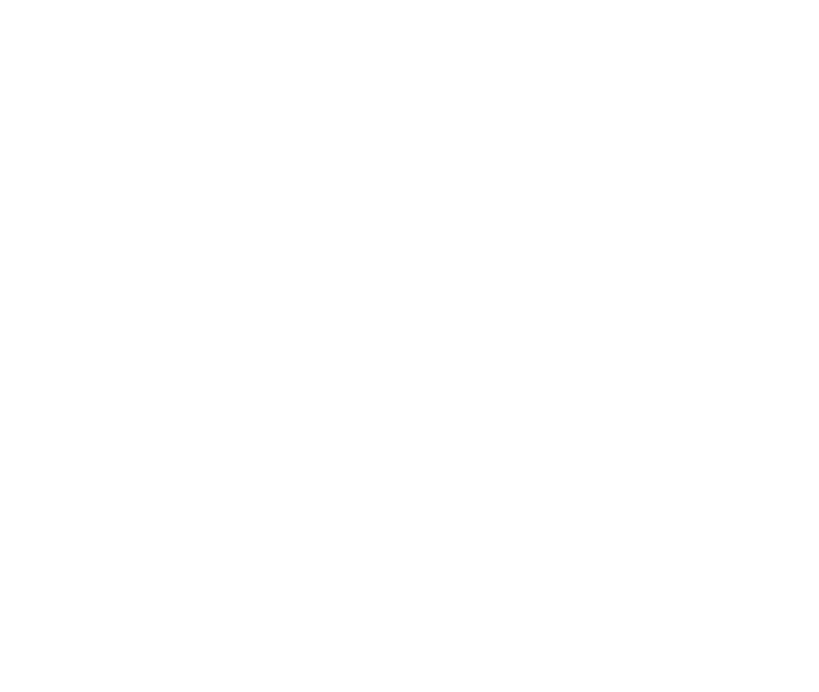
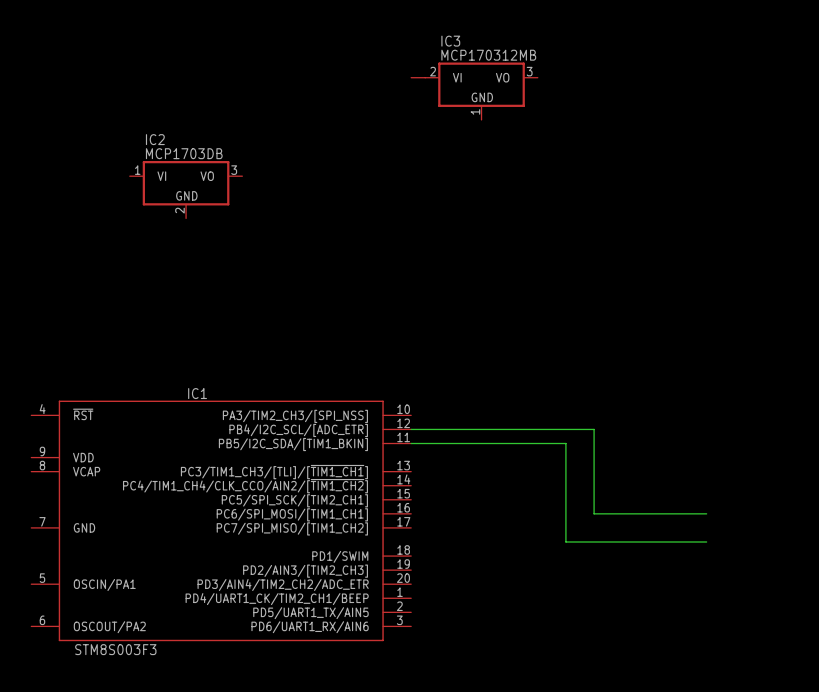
IC3: none -> MCP170312MB (474, 91)
IC2: none -> MCP1703DB (186, 189)
wire: none -> (411, 429) (594, 429) (594, 513) (706, 513)
wire: none -> (411, 443) (565, 443) (565, 541) (706, 541)
IC1: none -> STM8S003F3 (221, 520)

